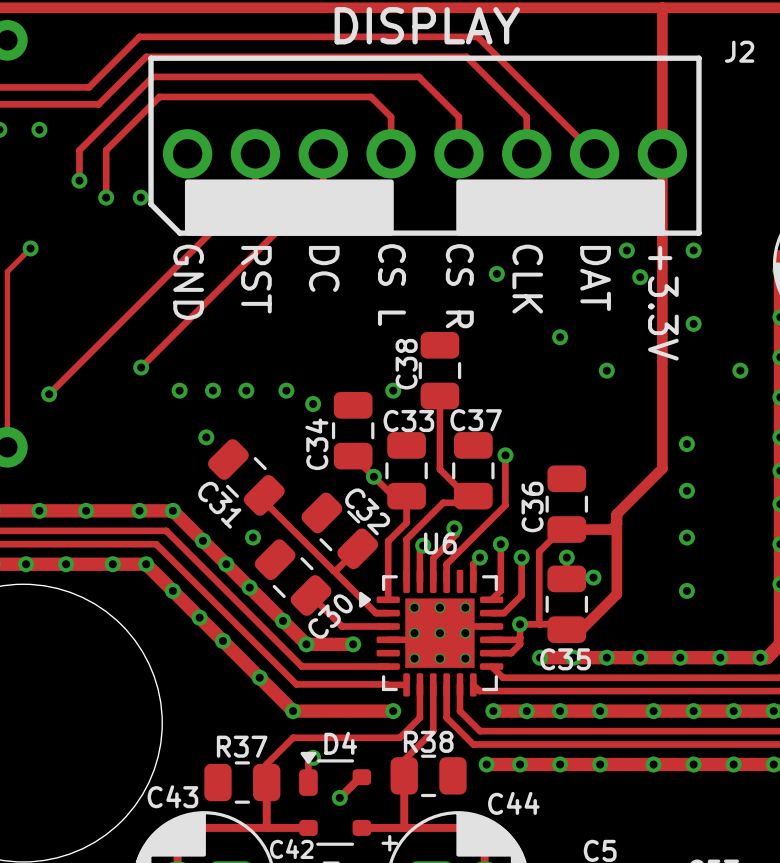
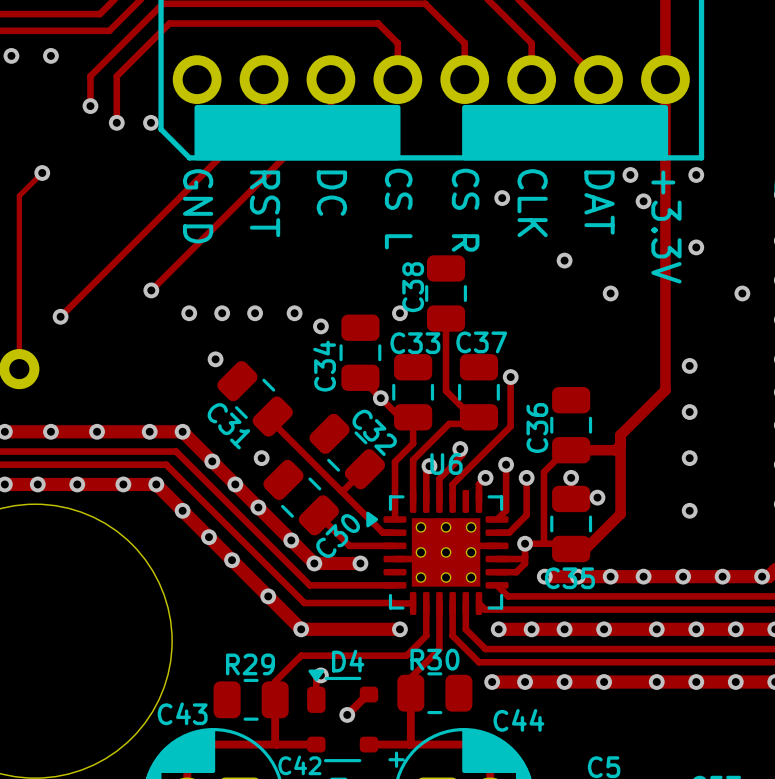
R38 name: R38 (428, 741) -> R30 (434, 659)
R37 name: R37 (242, 746) -> R29 (250, 664)

